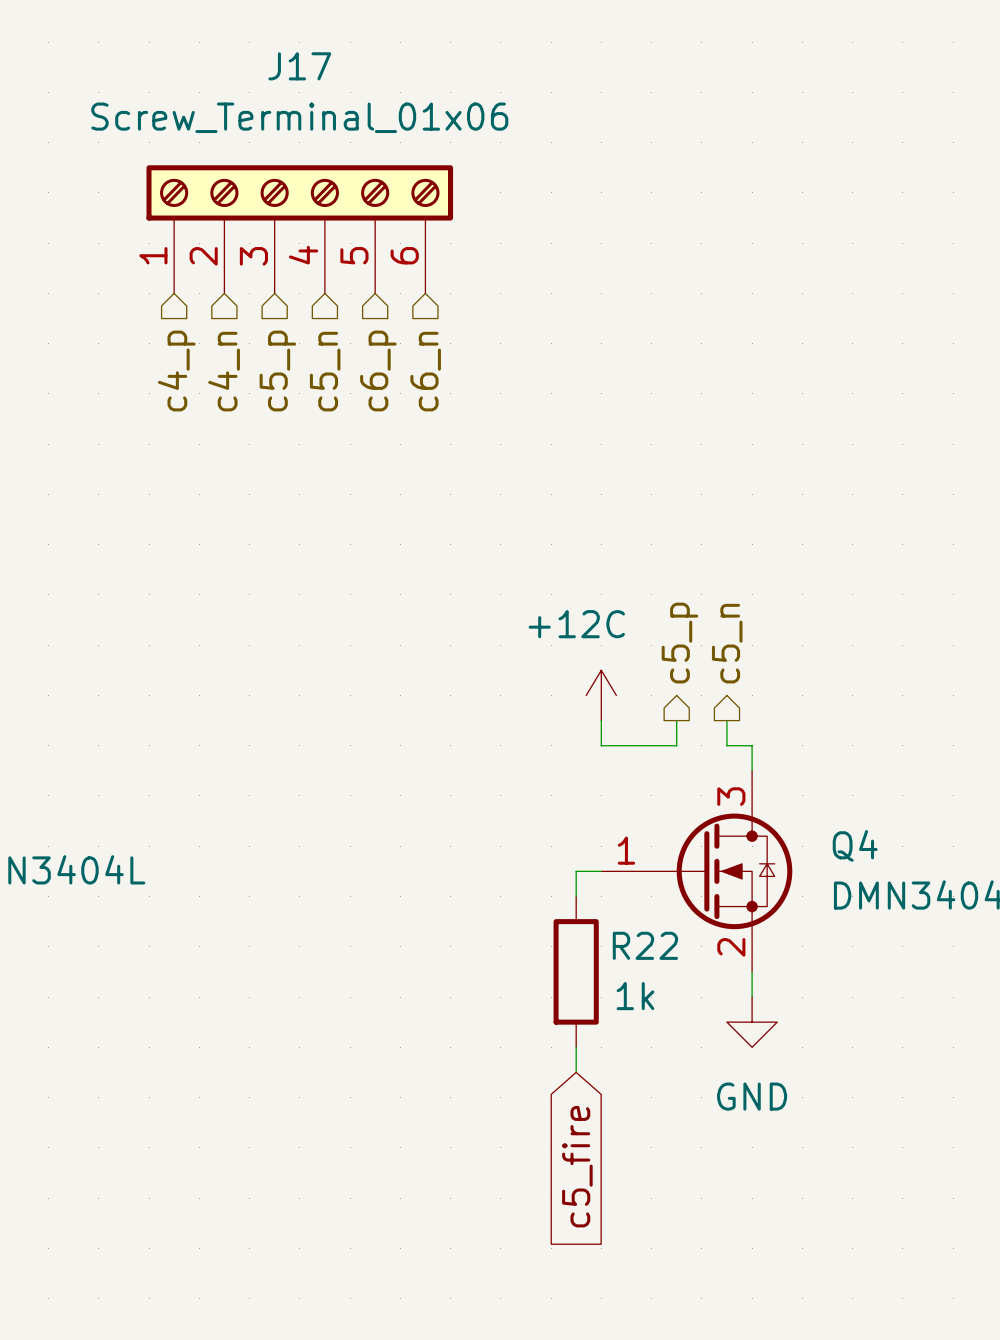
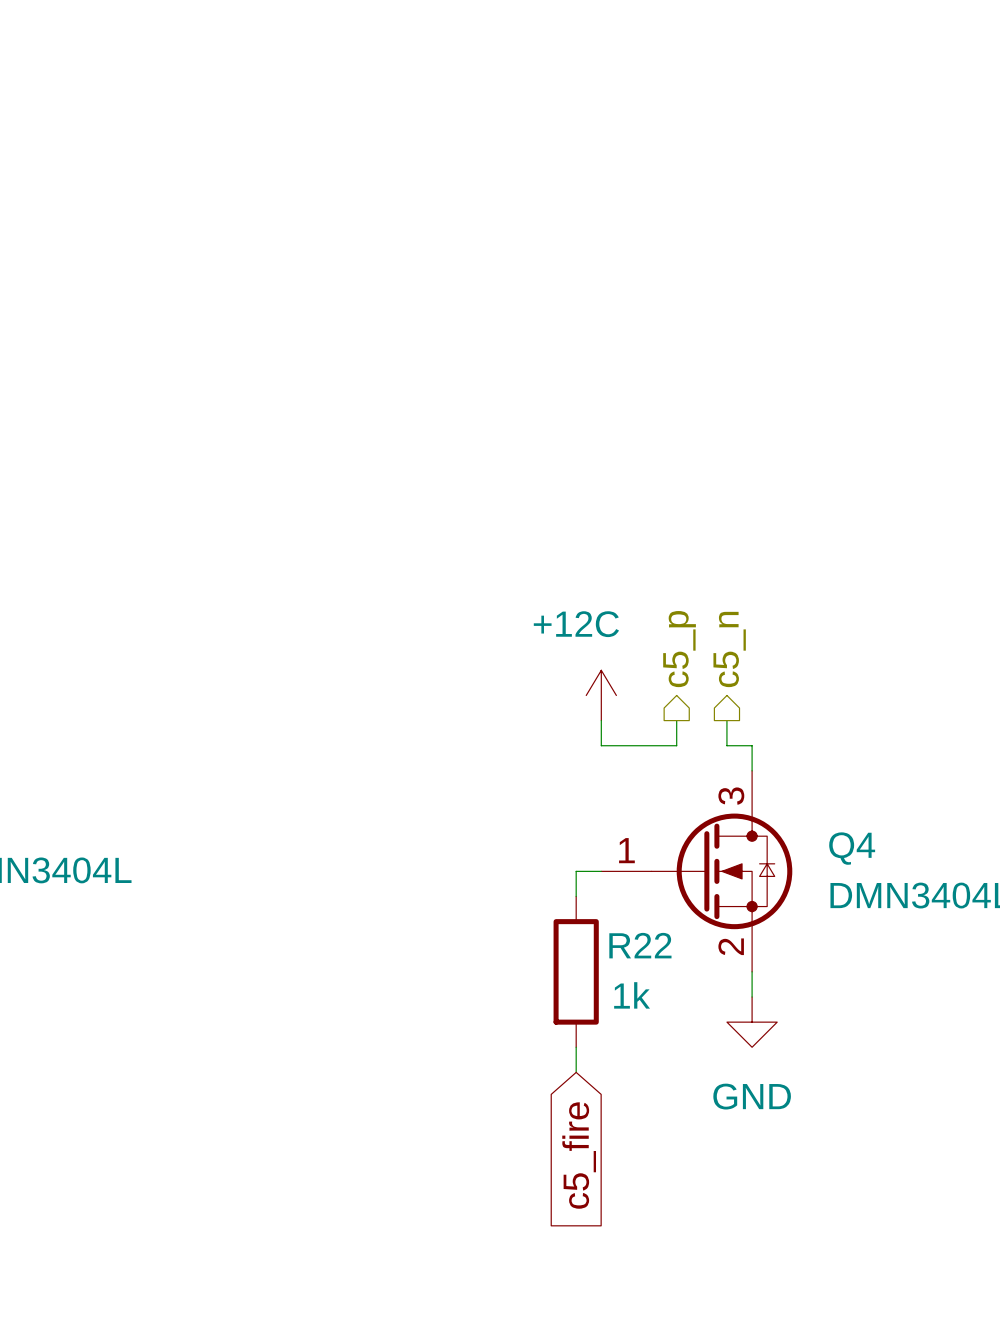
J17: Screw_Terminal_01x06 (299, 229) -> none
hierarchical label: c4_p (176, 370) -> none
hierarchical label: c5_p (277, 370) -> none
hierarchical label: c6_p (378, 370) -> none
hierarchical label: c4_n (224, 371) -> none
hierarchical label: c5_n (325, 371) -> none
hierarchical label: c6_n (425, 371) -> none

